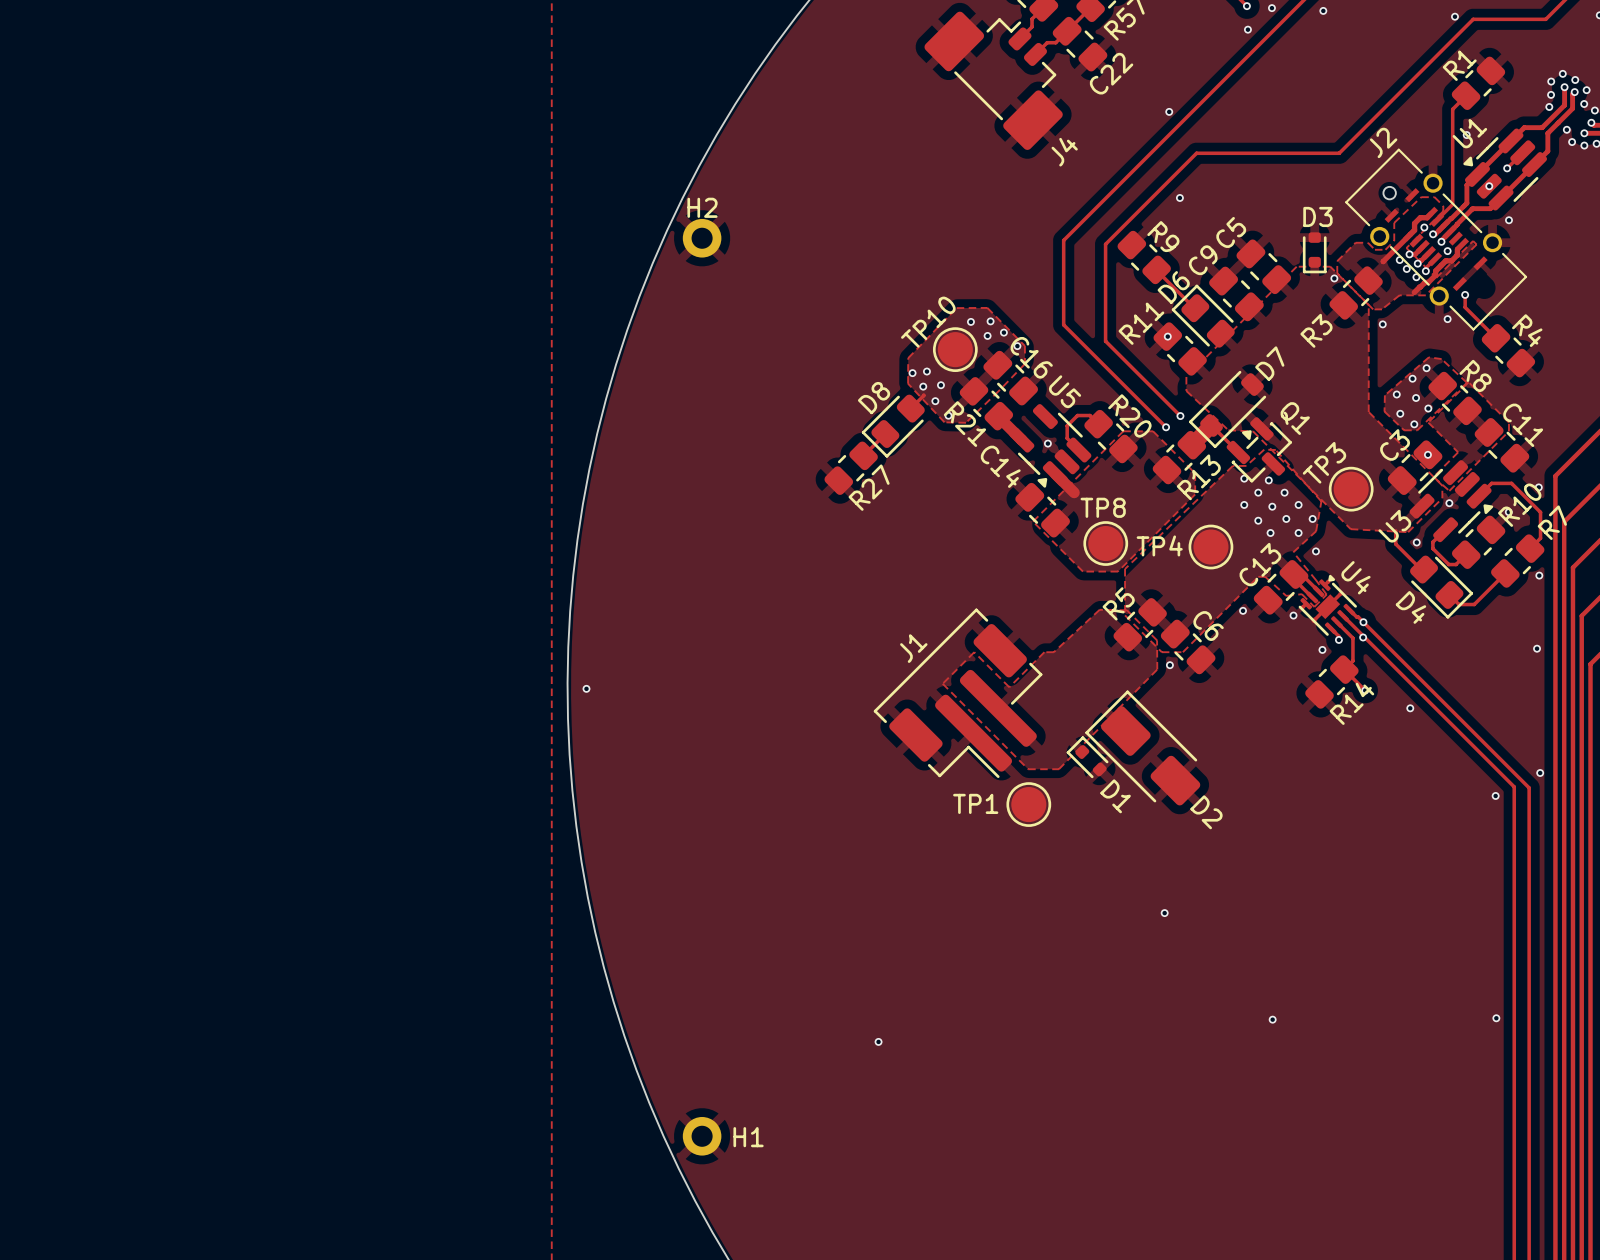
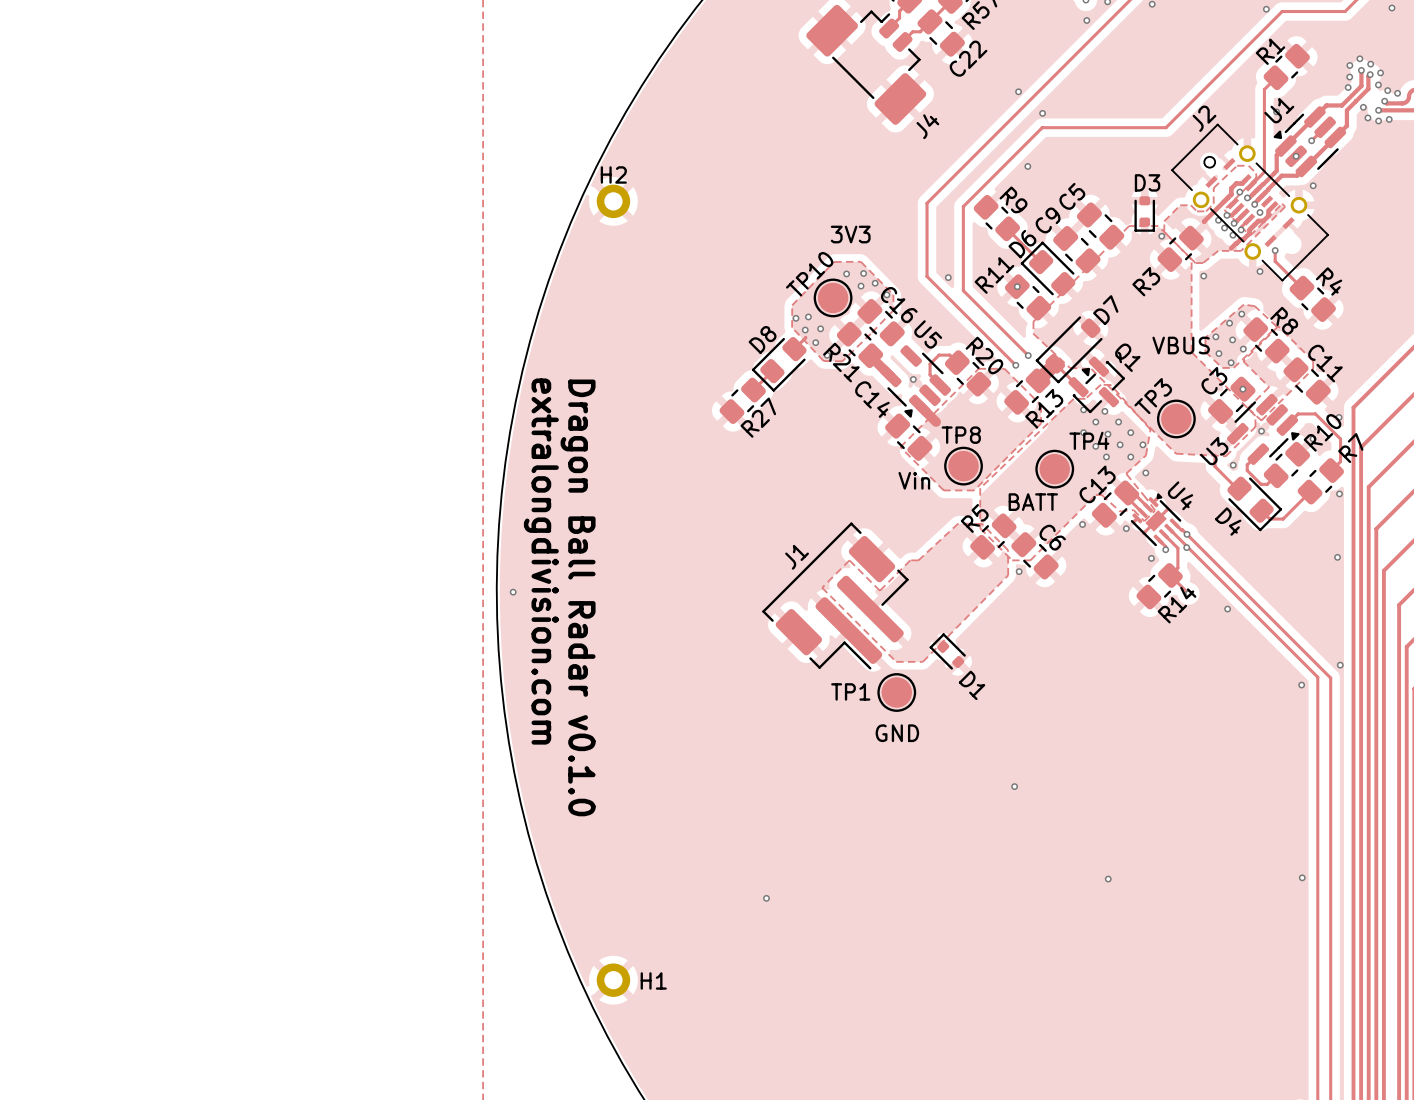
via: none -> (1042, 113)
text: none -> 3V3 (850, 234)
via: none -> (948, 277)
text: none -> VBUS (1181, 345)
TP4 name position: TP4 (1159, 545) -> TP4 (1089, 440)
text: none -> Vin (914, 480)
text: none -> BATT (1033, 502)
text: none -> extralongdivision.com (541, 561)
text: none -> Dragon Ball Radar v0.1.0 (578, 597)
D2: (1142, 747) -> none
text: none -> GND (897, 733)

